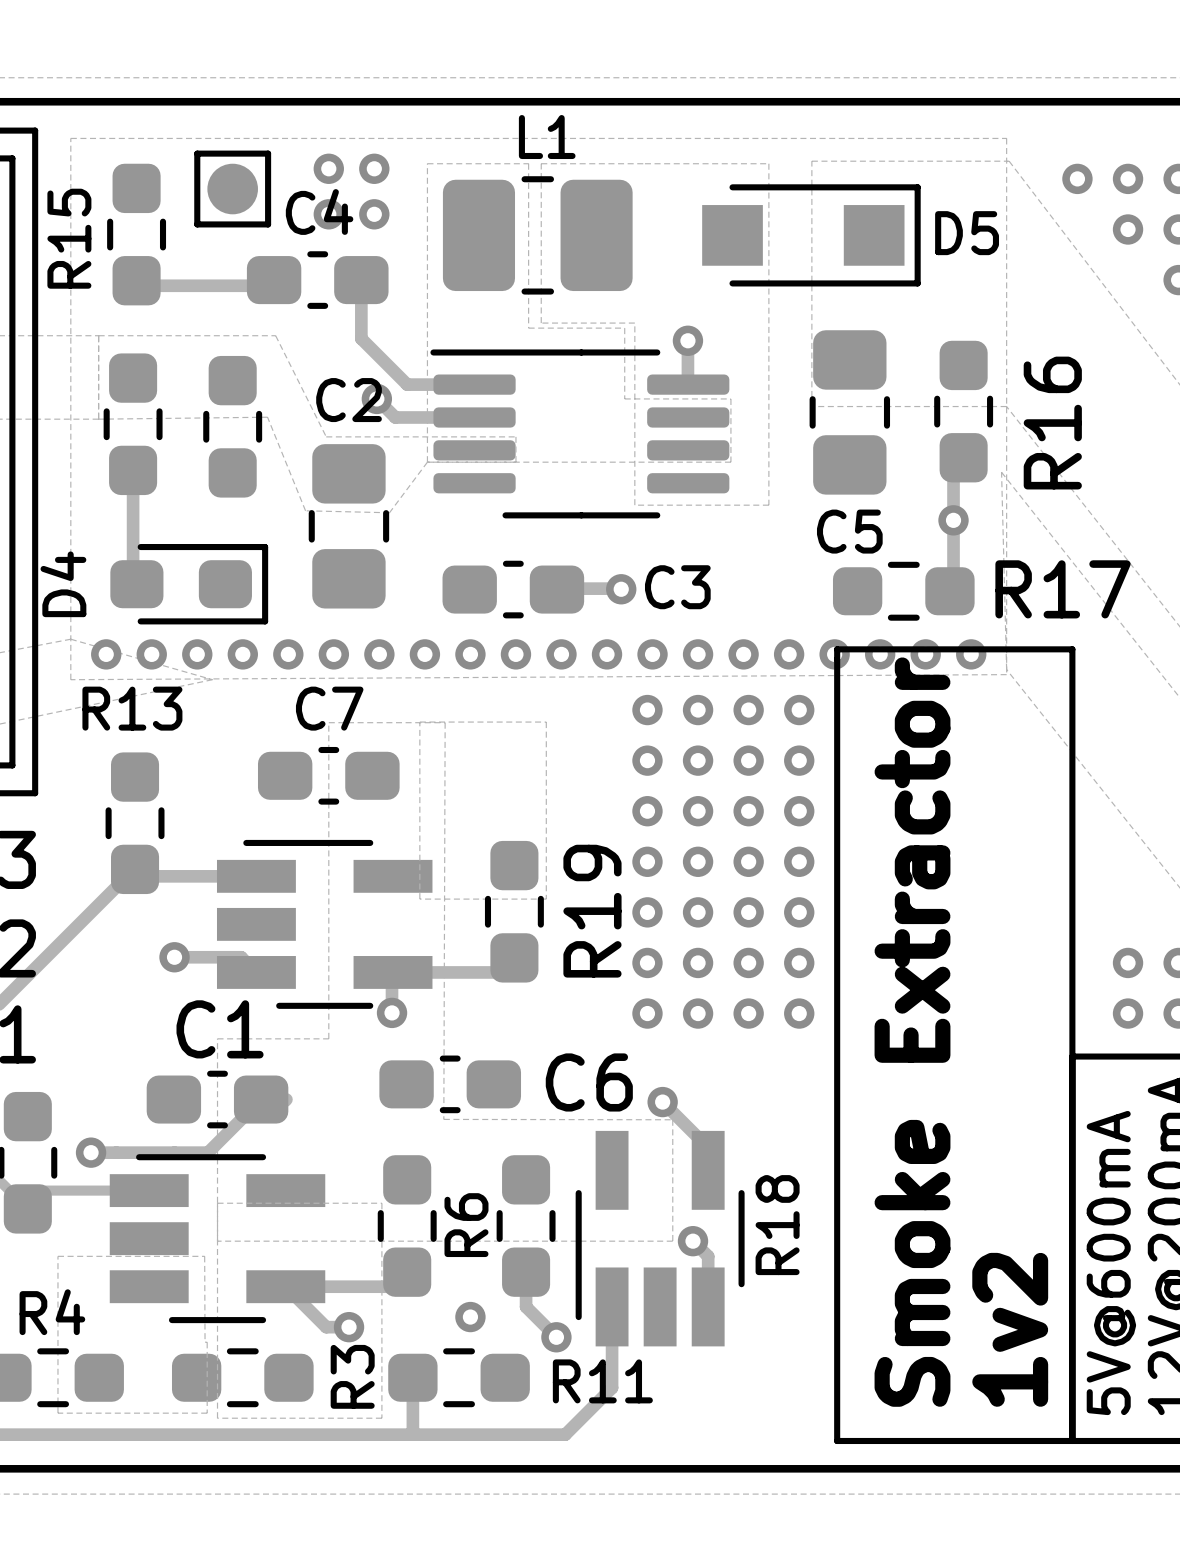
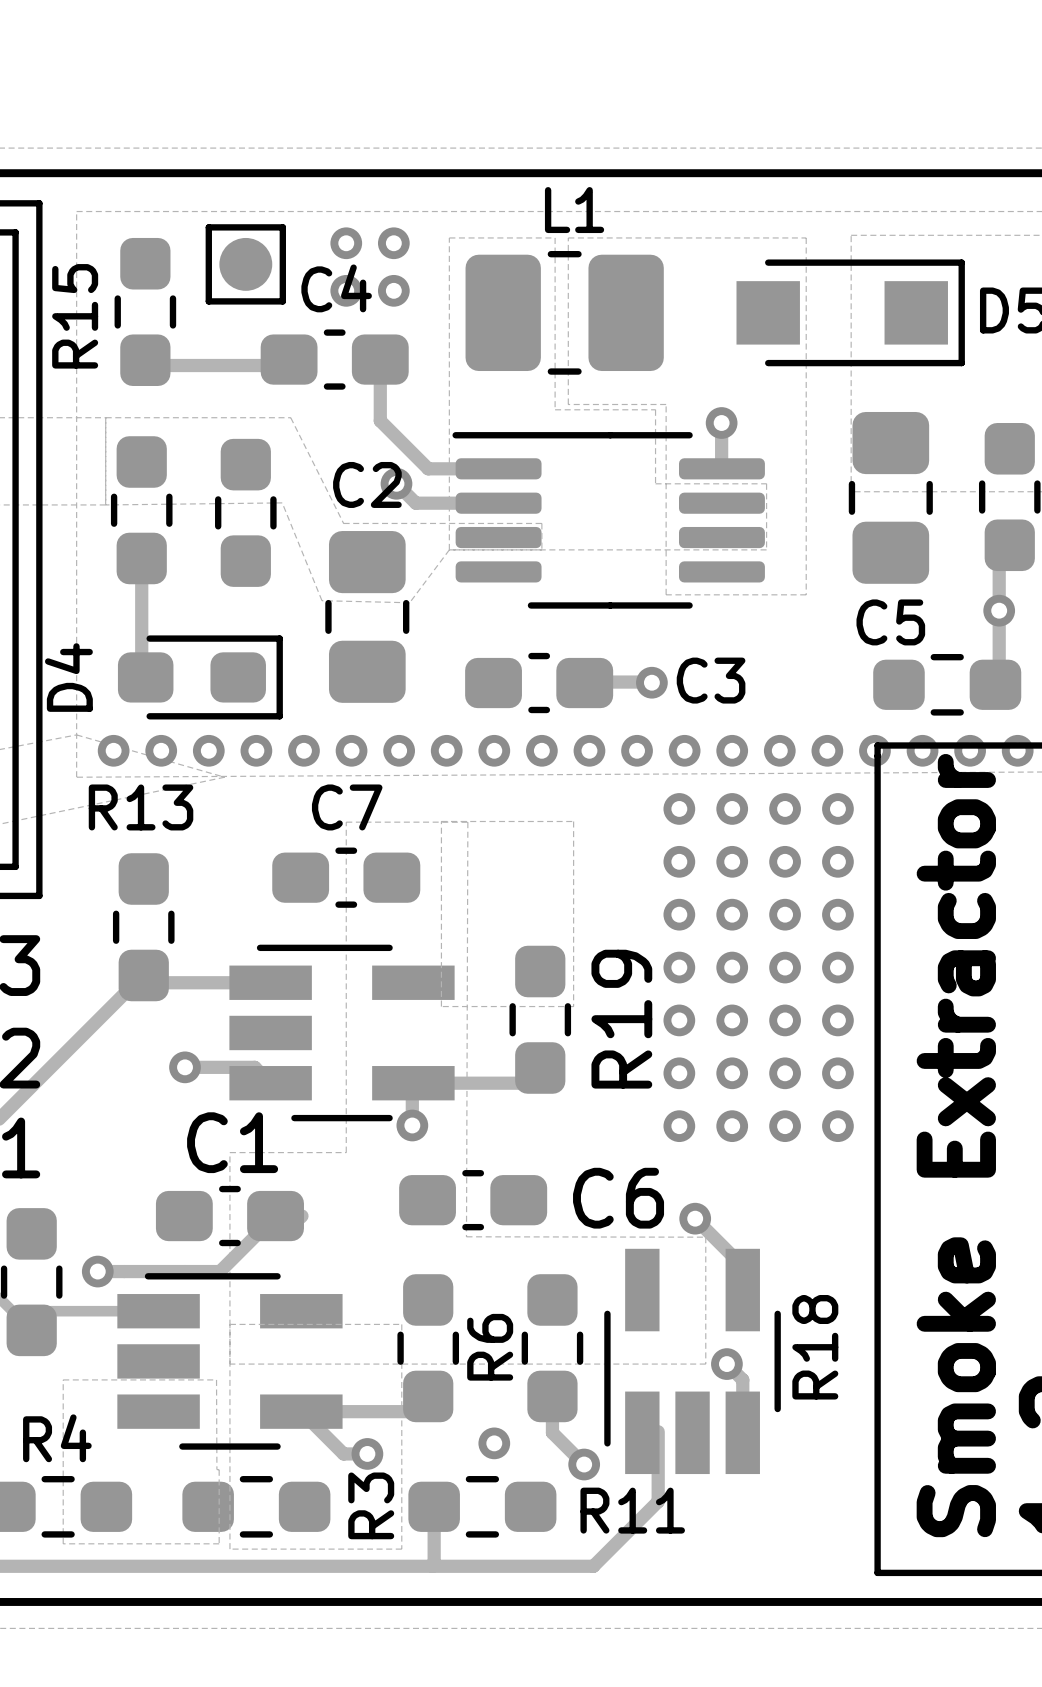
track: (612, 1306) (612, 1387) -> (658, 1431) (658, 1501) (642, 1517)

